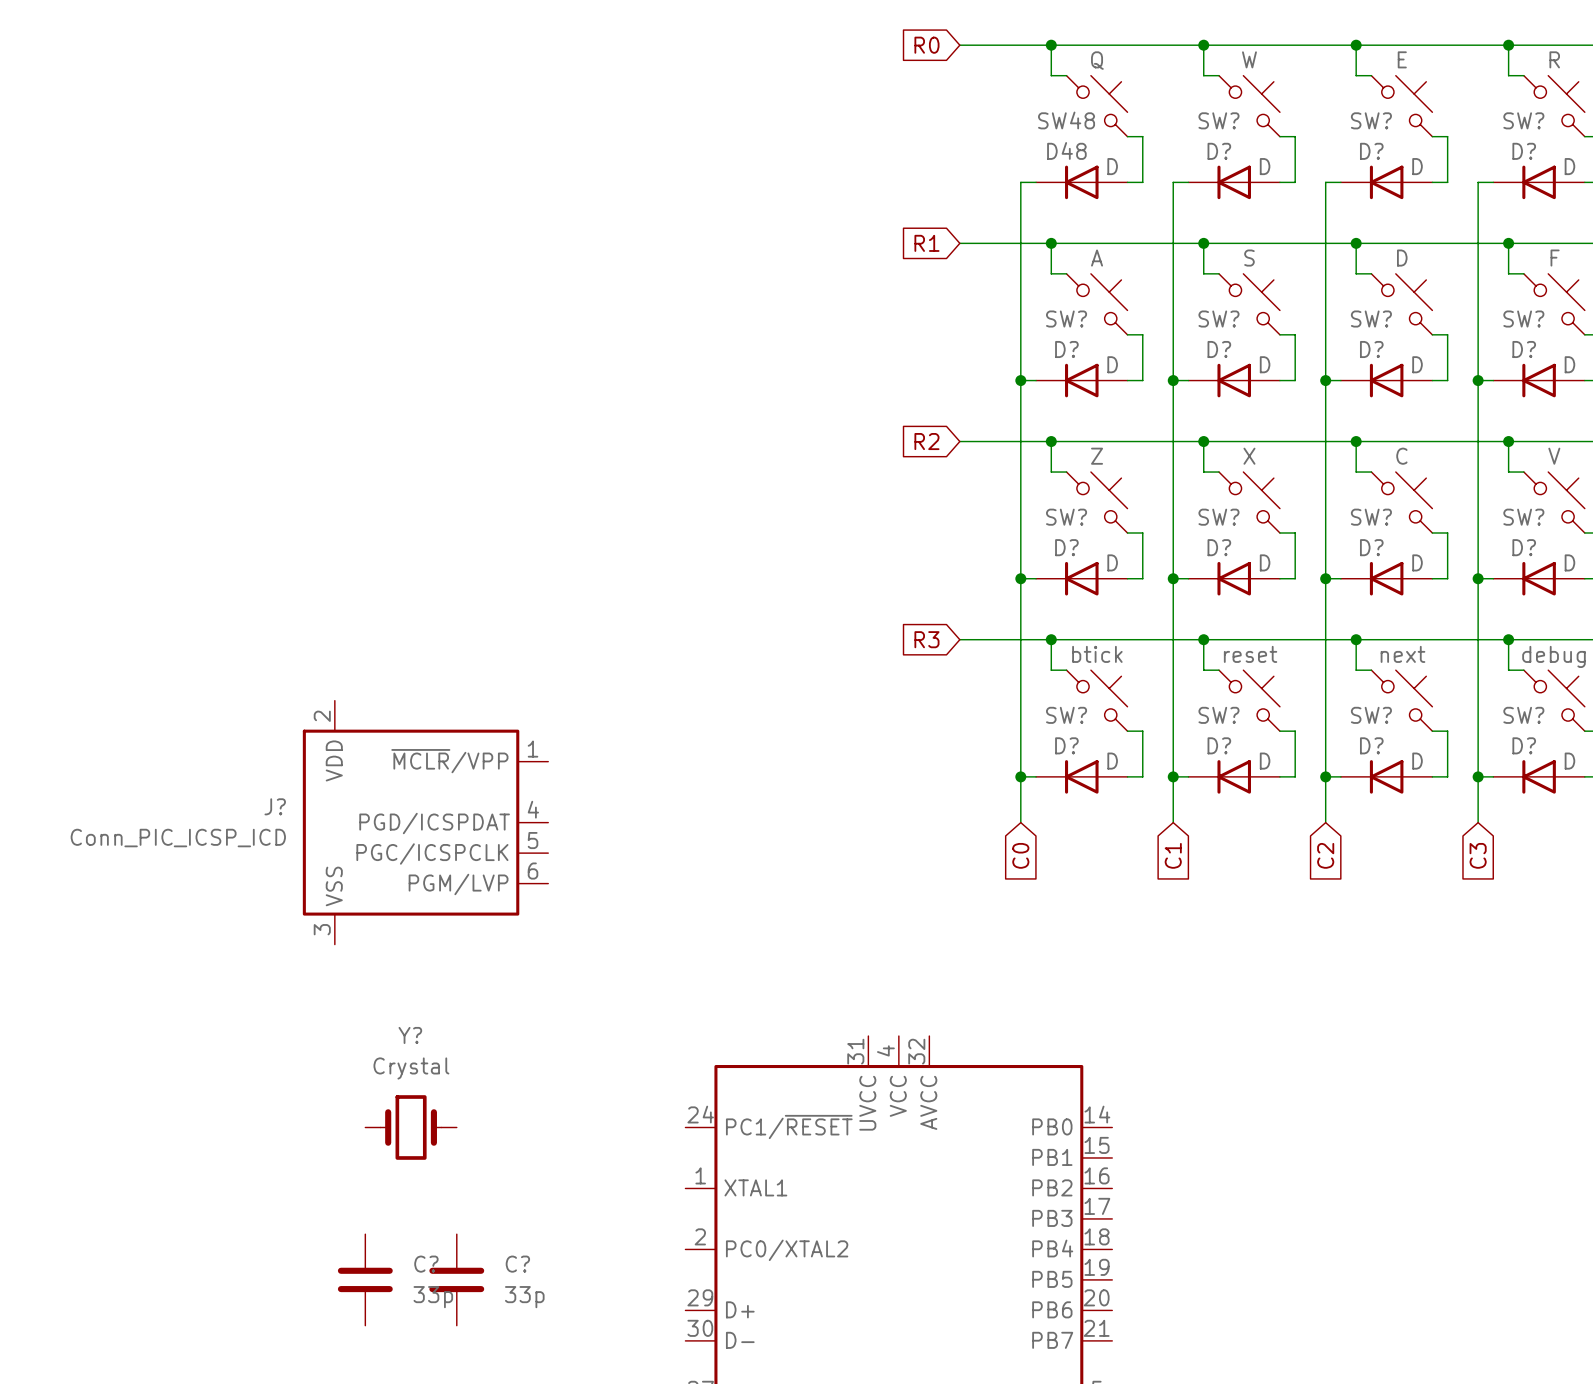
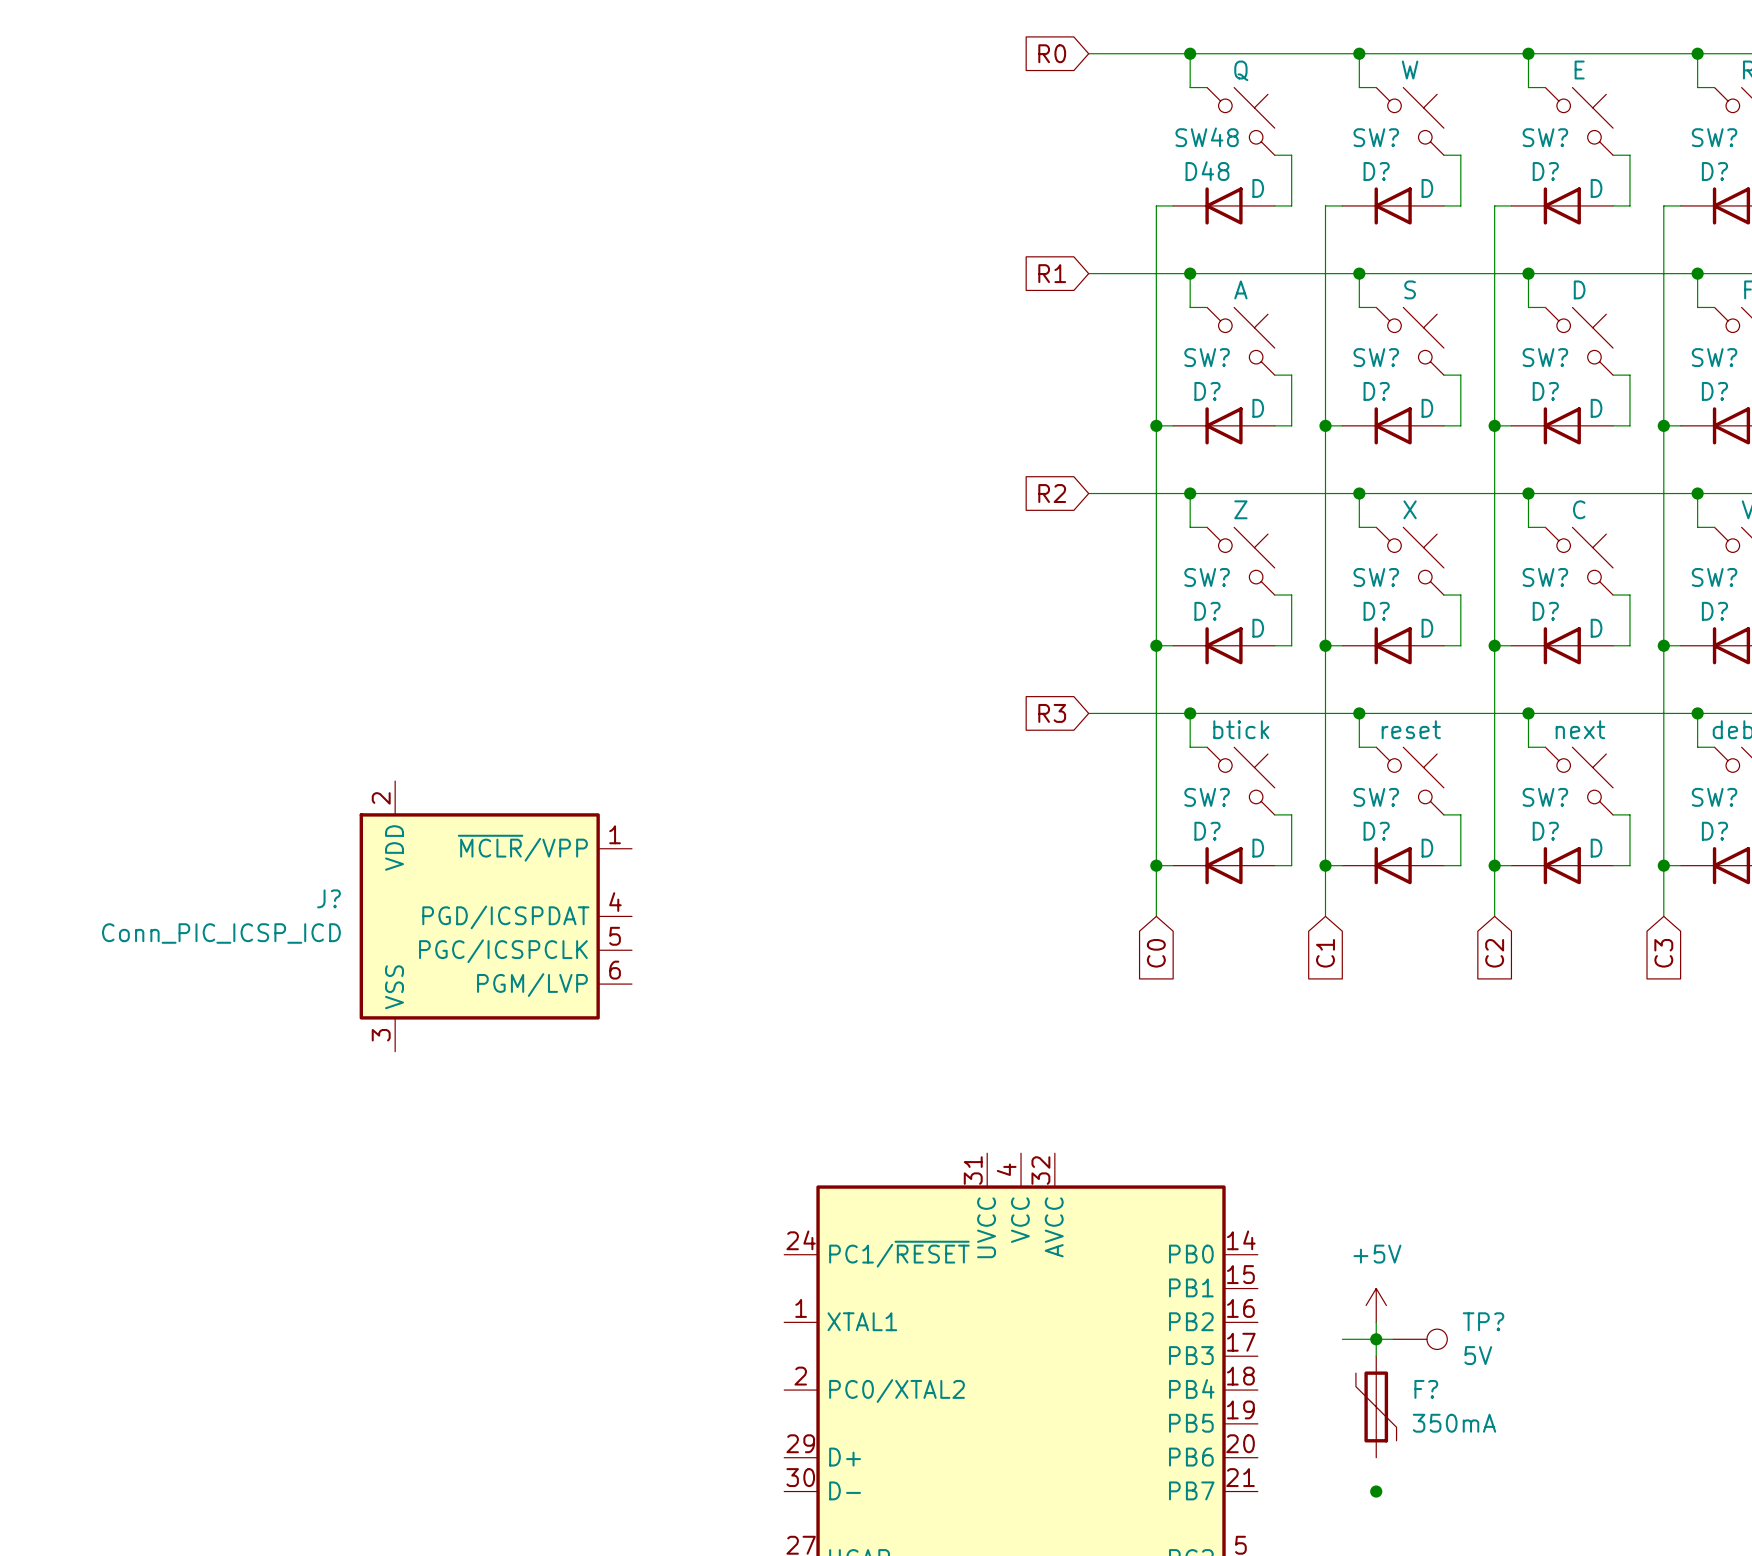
Y?: Crystal (411, 1127) -> none
power symbol: none -> +5V (1376, 1305)
wire: none -> (1376, 1322) (1376, 1356)
wire: none -> (1342, 1339) (1393, 1339)
junction: none -> (1376, 1339)
TP?: none -> 5V (1420, 1339)
F?: none -> 350mA (1376, 1406)
C?: 33p (365, 1279) -> none
C?: 33p (456, 1279) -> none
junction: none -> (1376, 1491)

